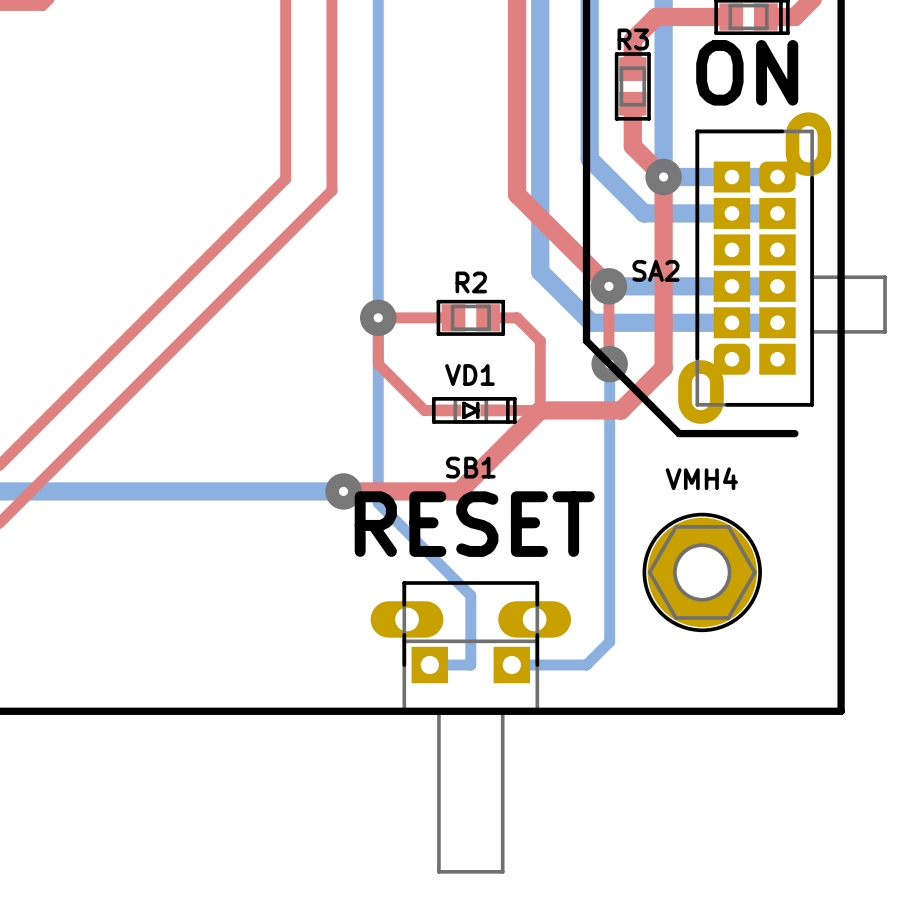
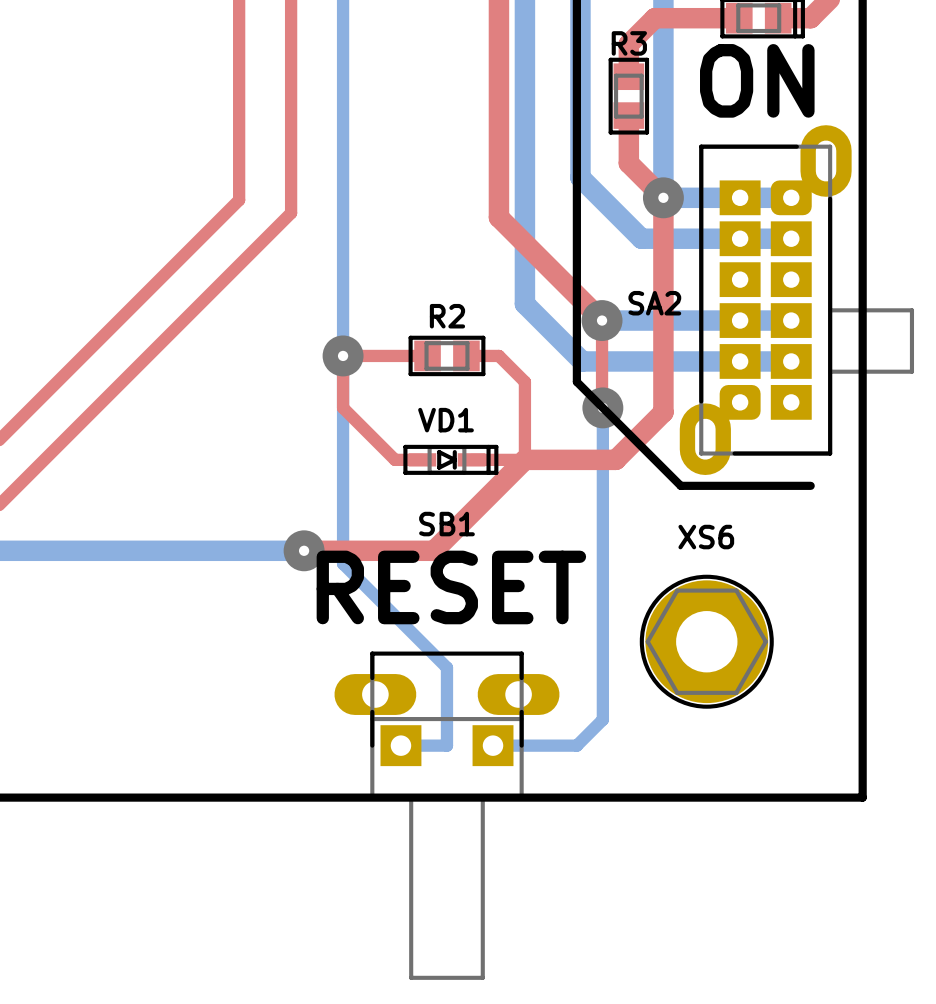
VMH4: (702, 572) -> none
XS6: none -> (706, 641)

